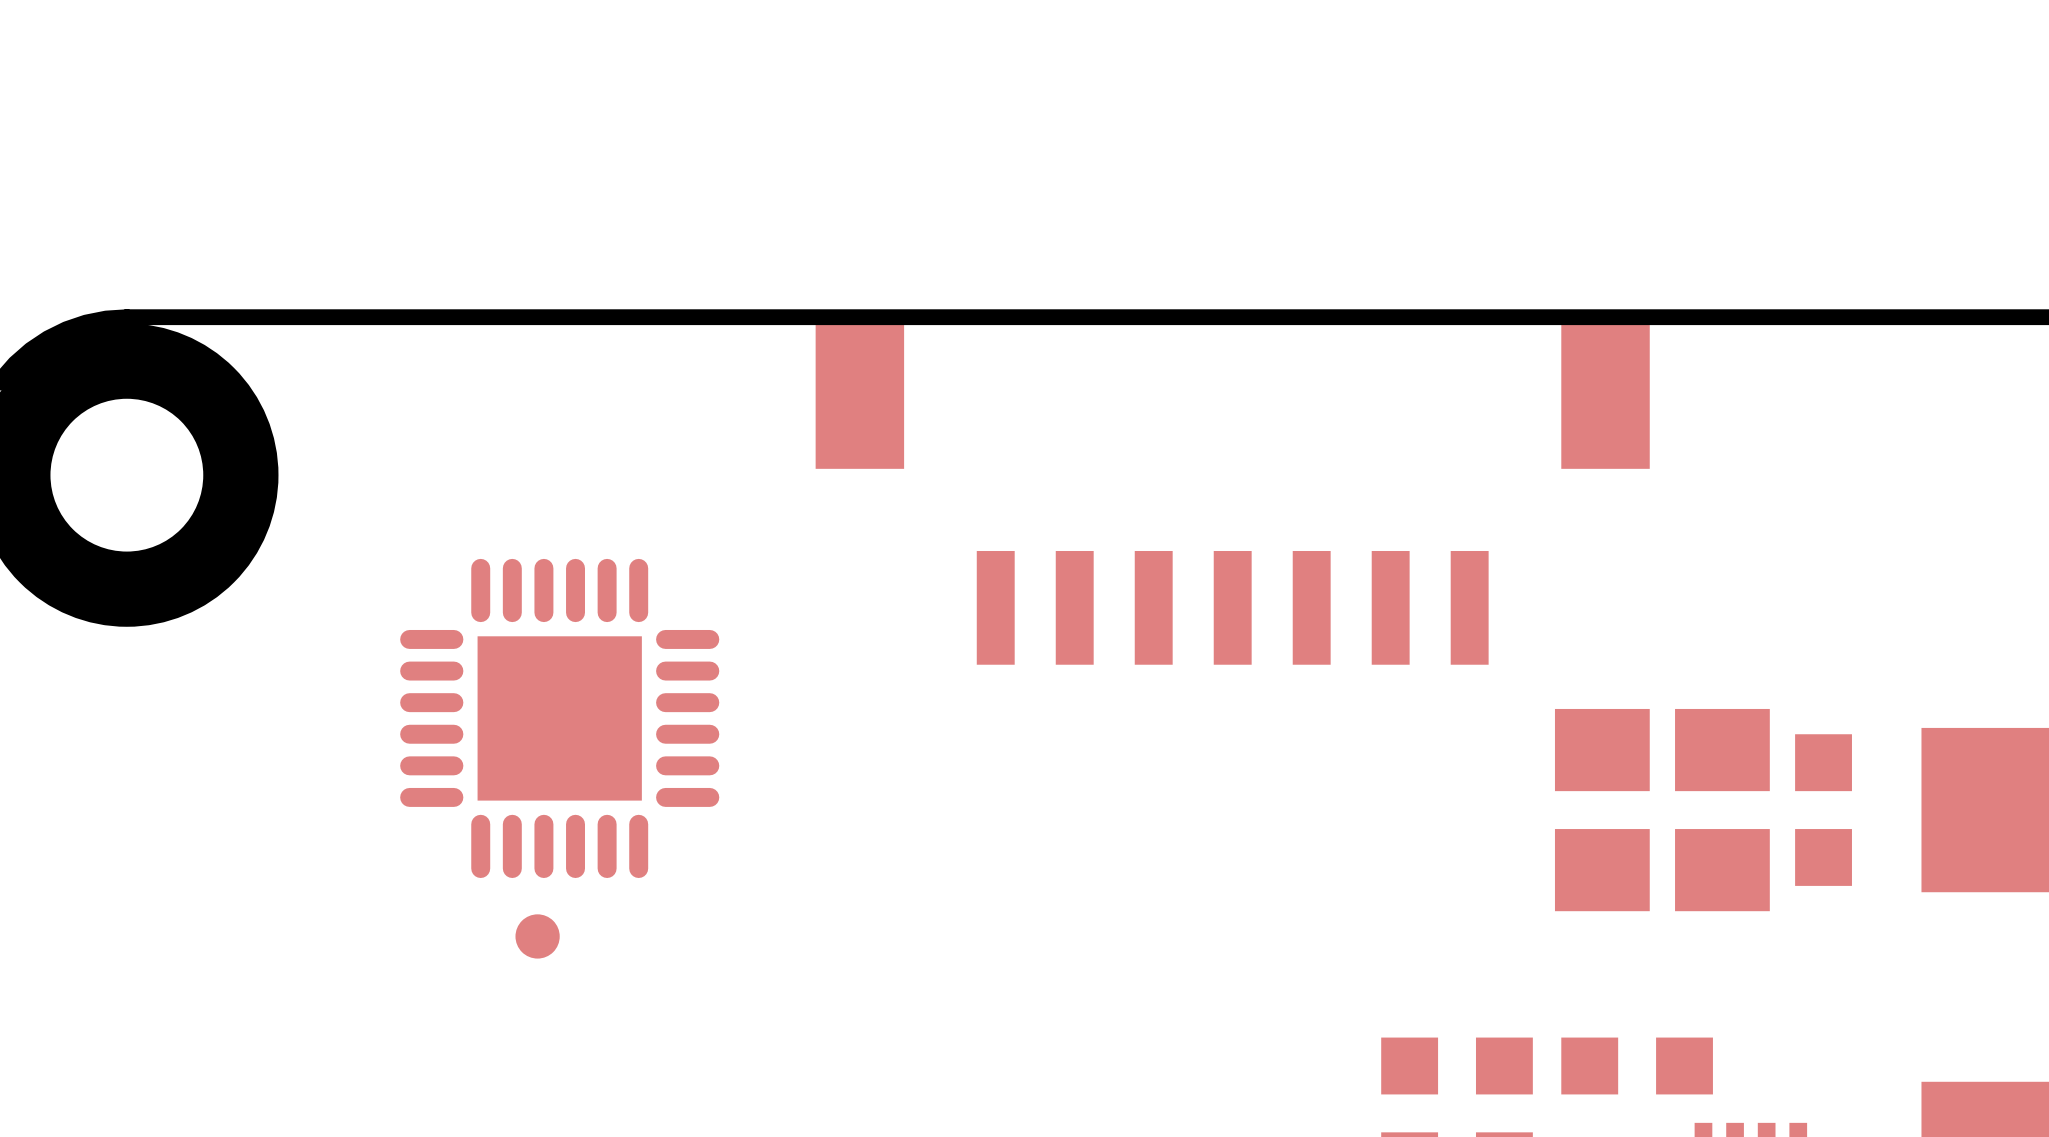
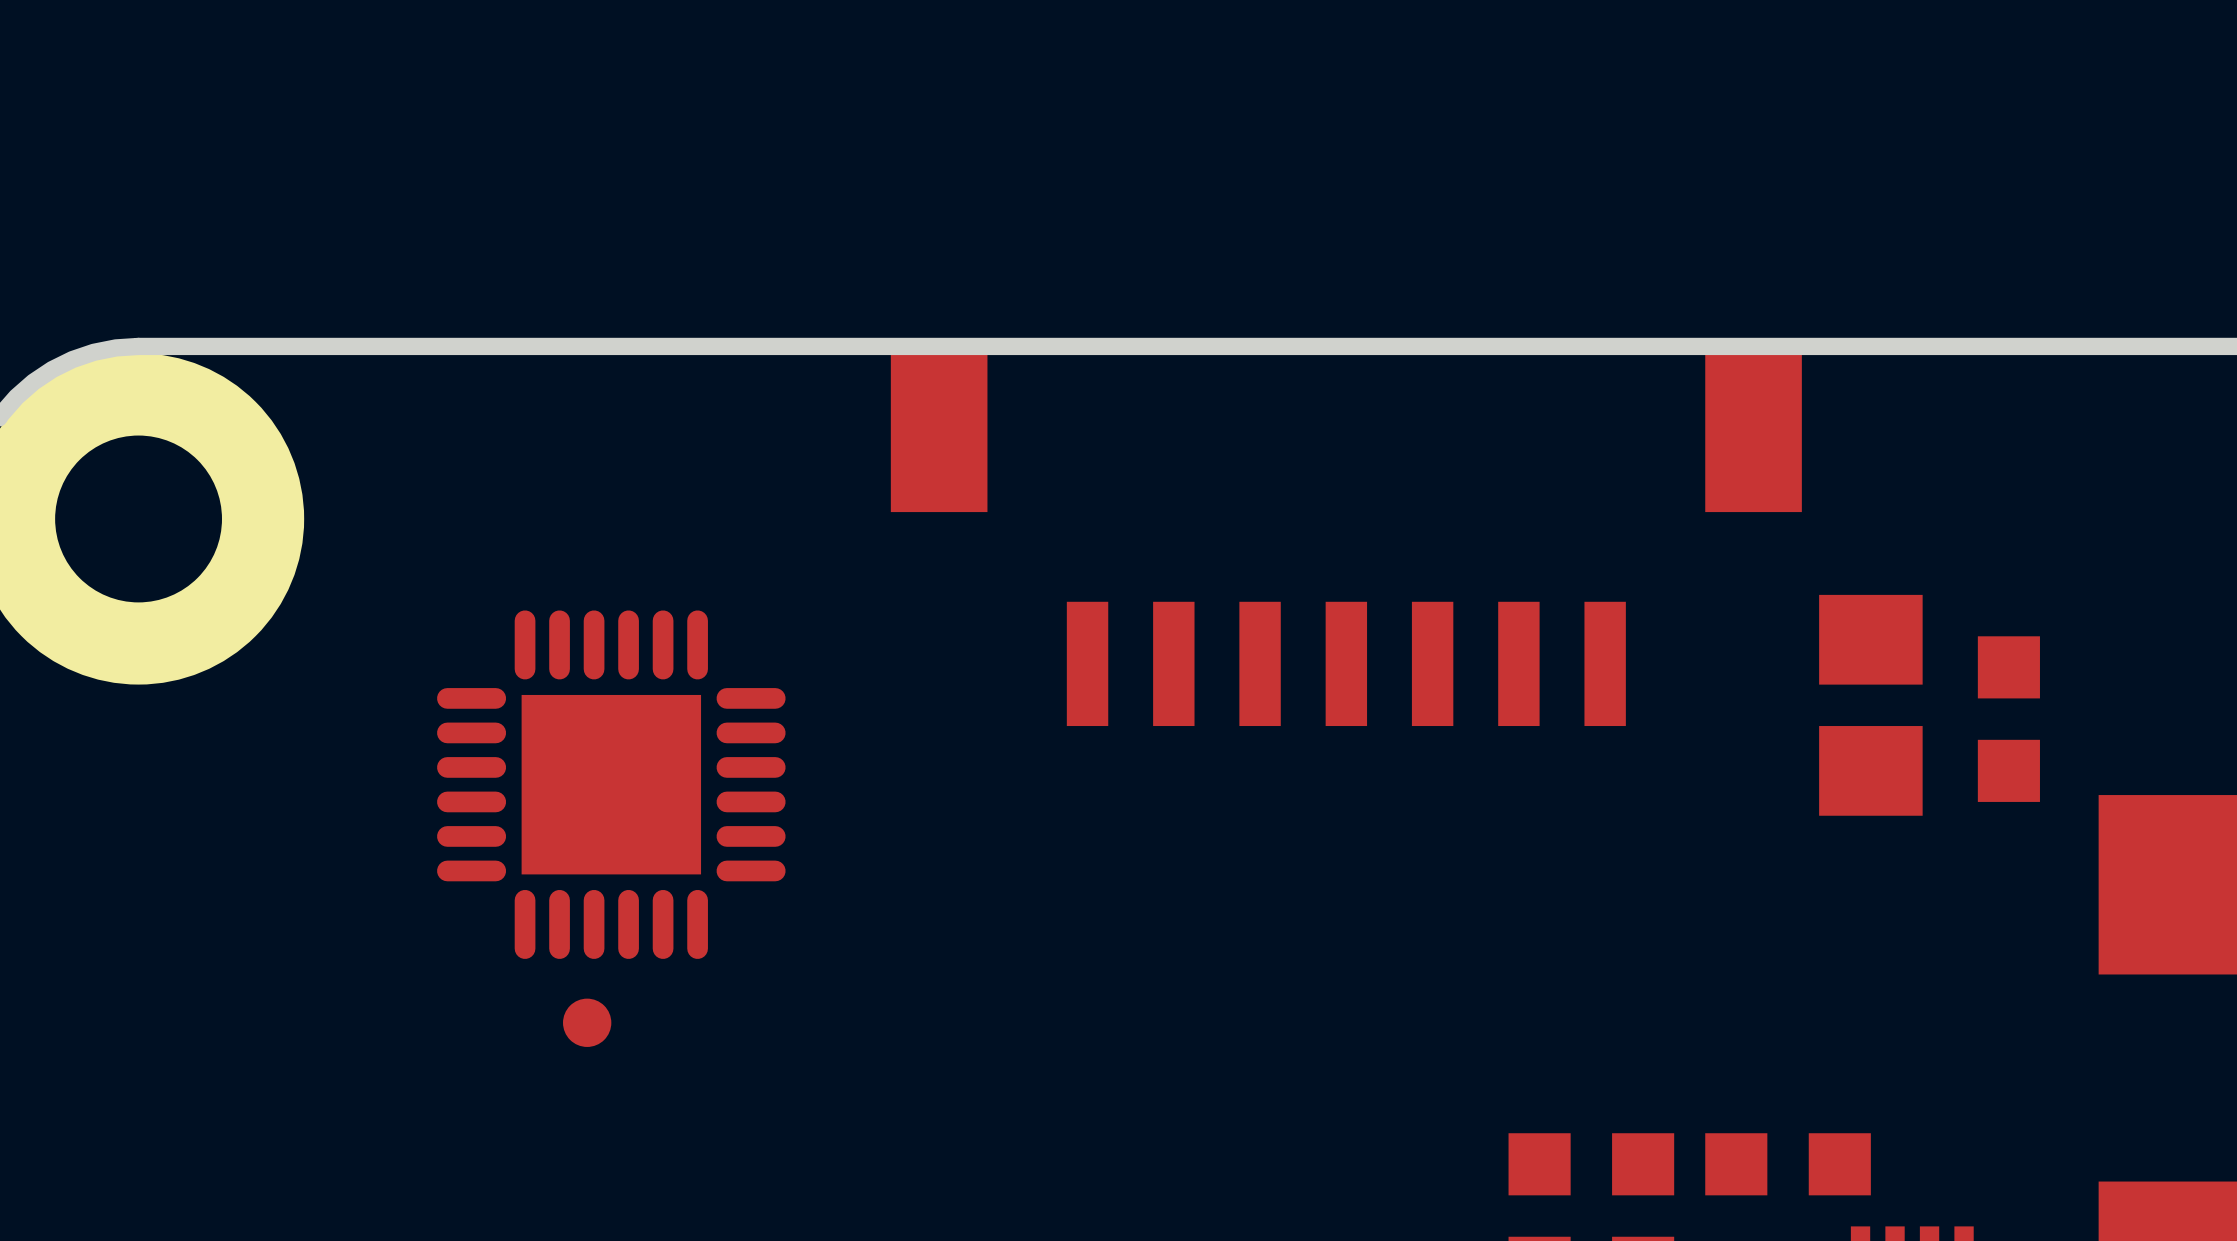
part: none -> (1870, 705)
part: (1602, 810) -> none
part: (1722, 810) -> none
part position: (1823, 810) -> (2008, 719)

